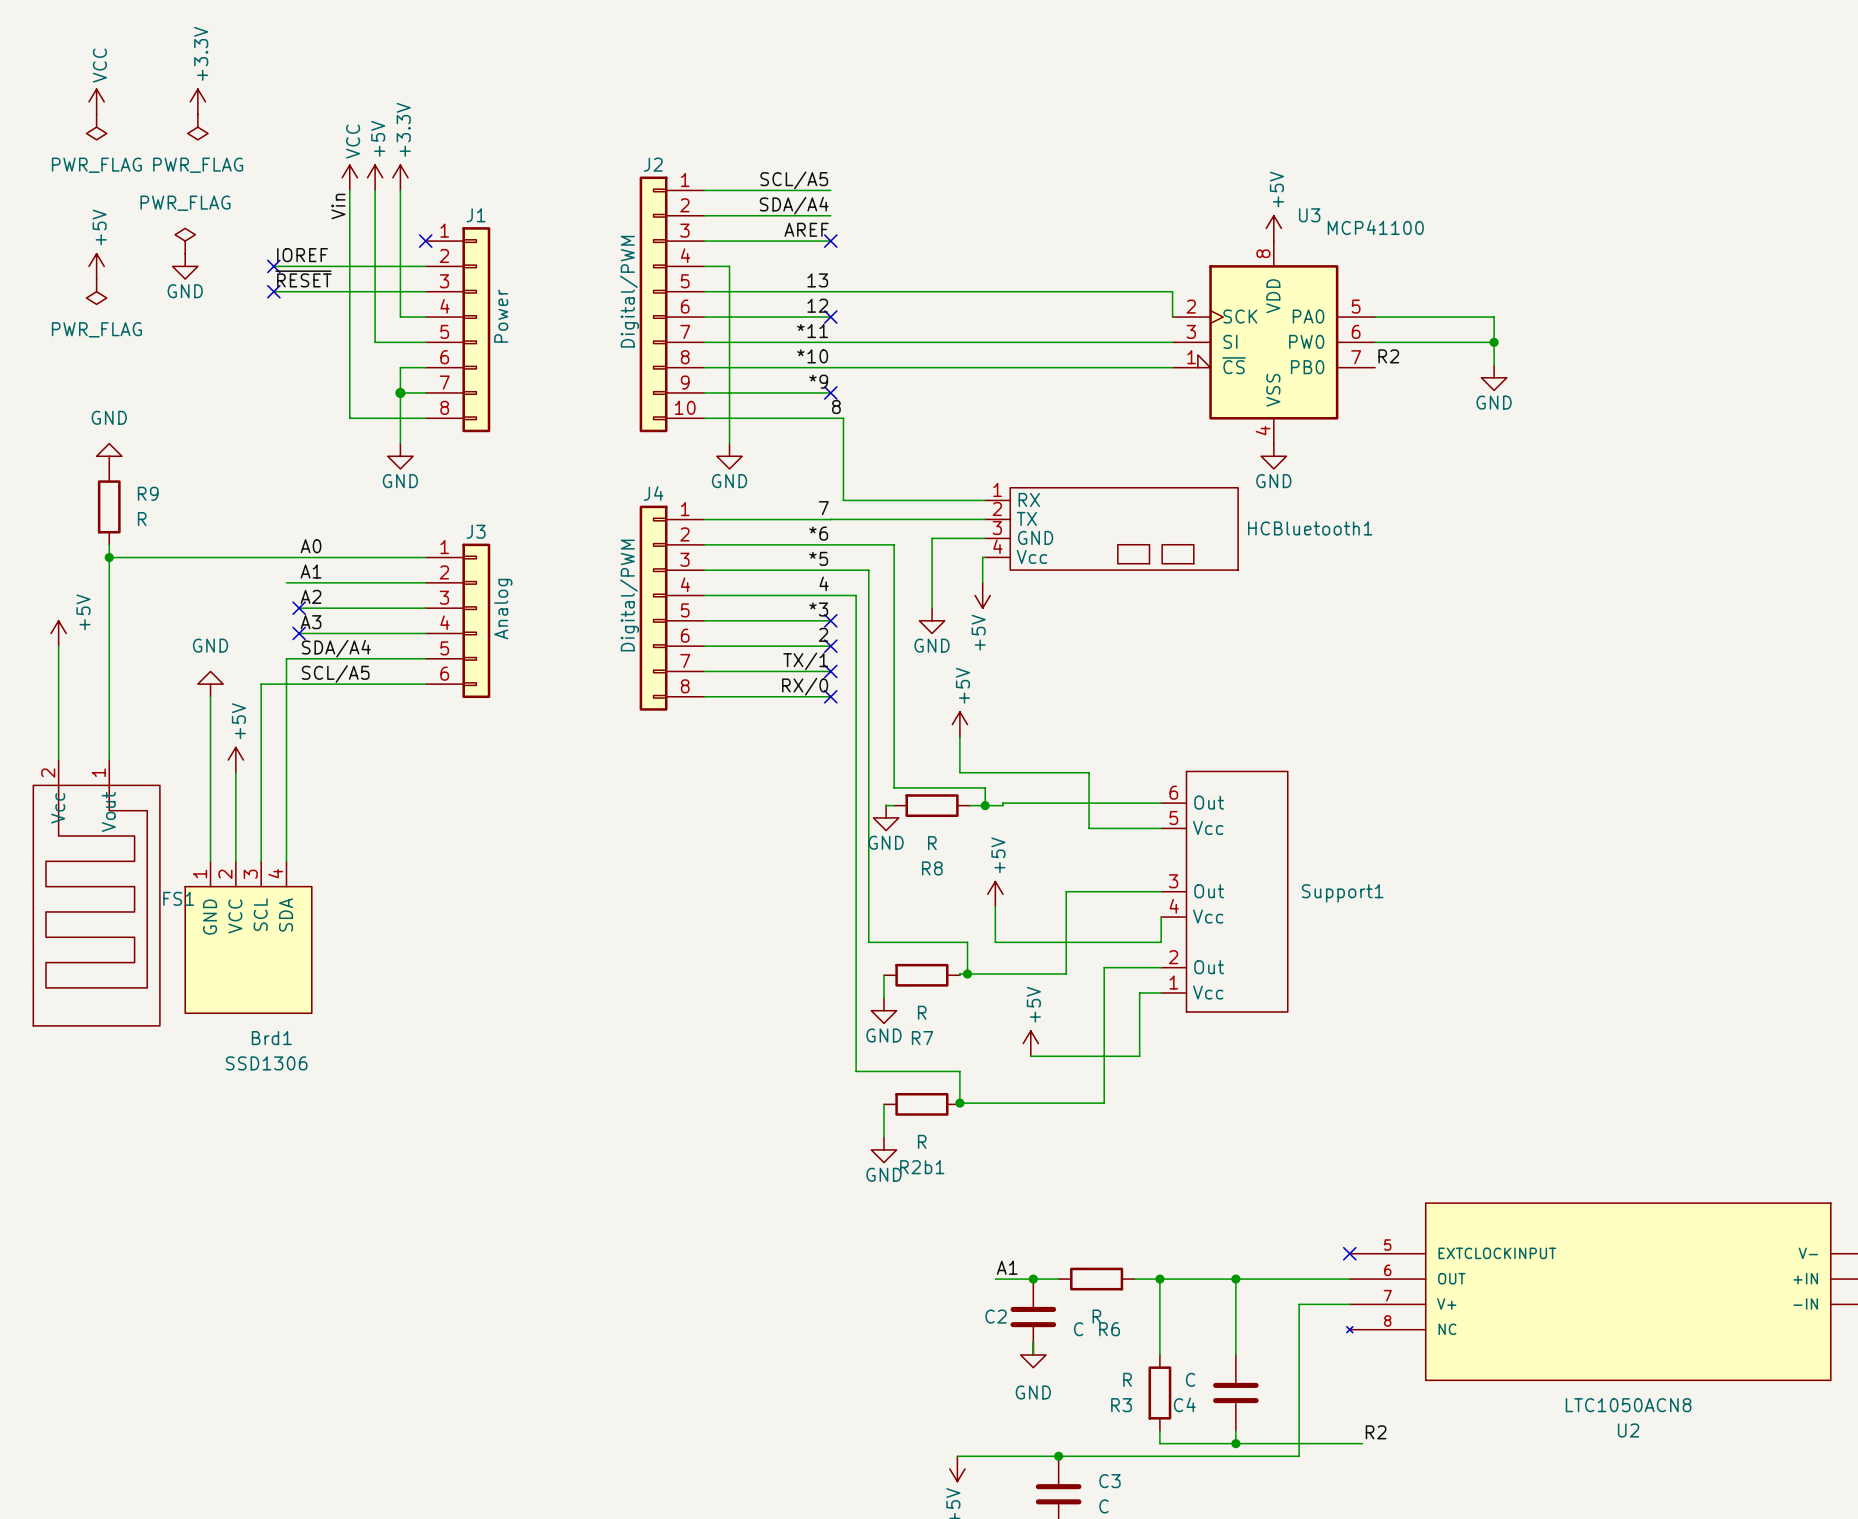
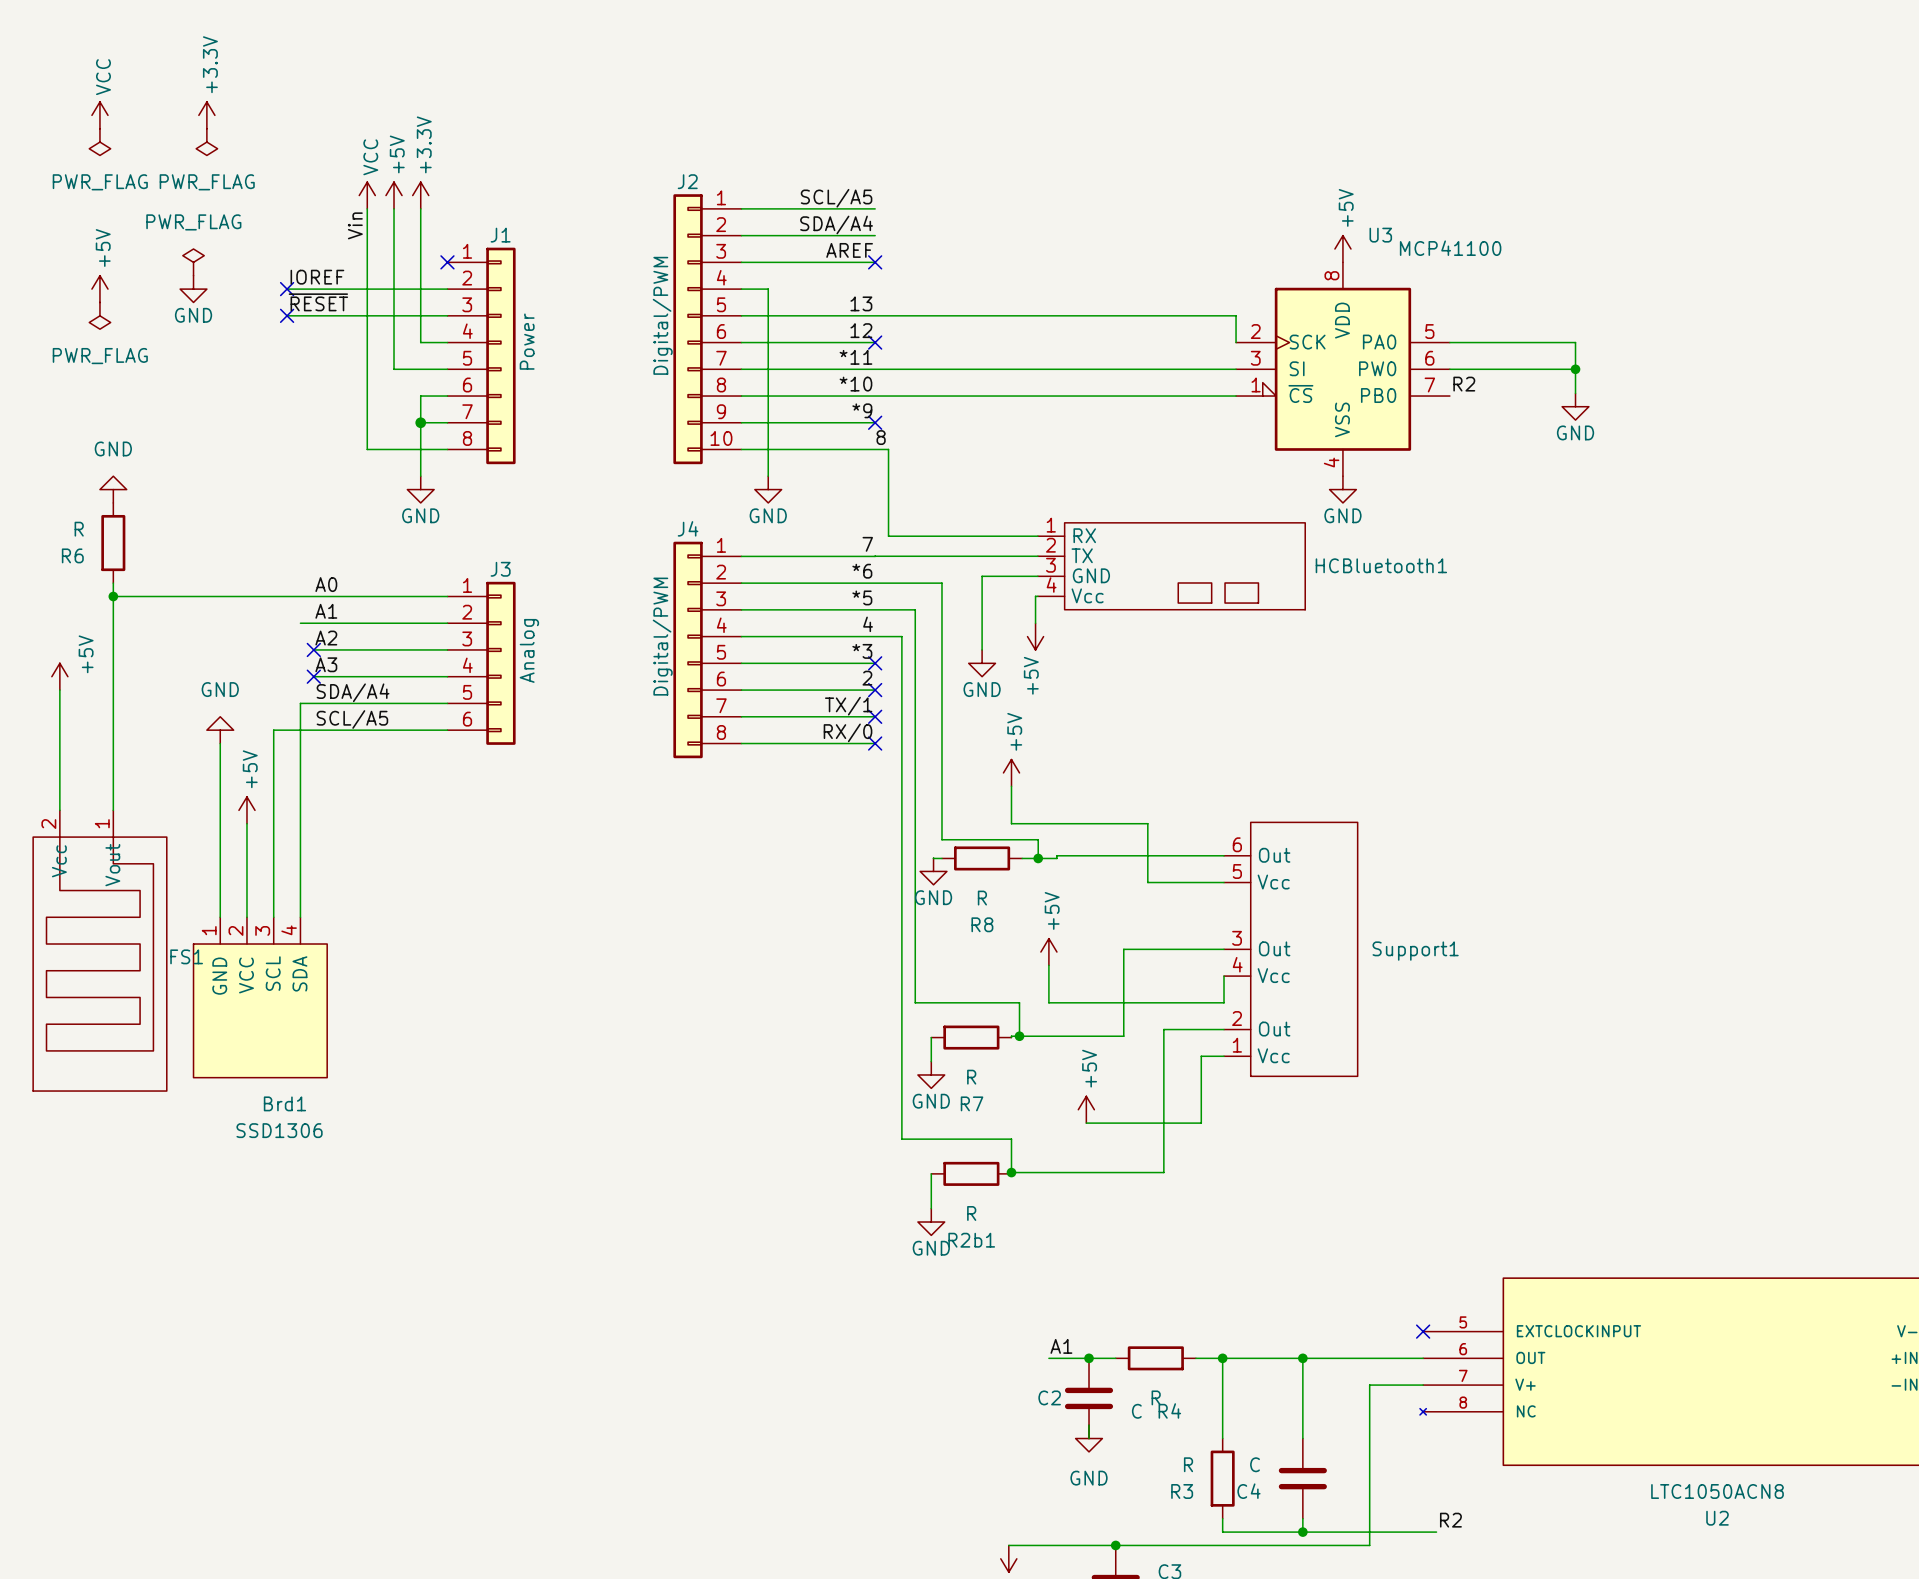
R9 name: R9 (148, 493) -> R6 (72, 555)
R9 value position: R (142, 519) -> R (79, 529)
R6 name: R6 (1109, 1329) -> R4 (1169, 1410)

